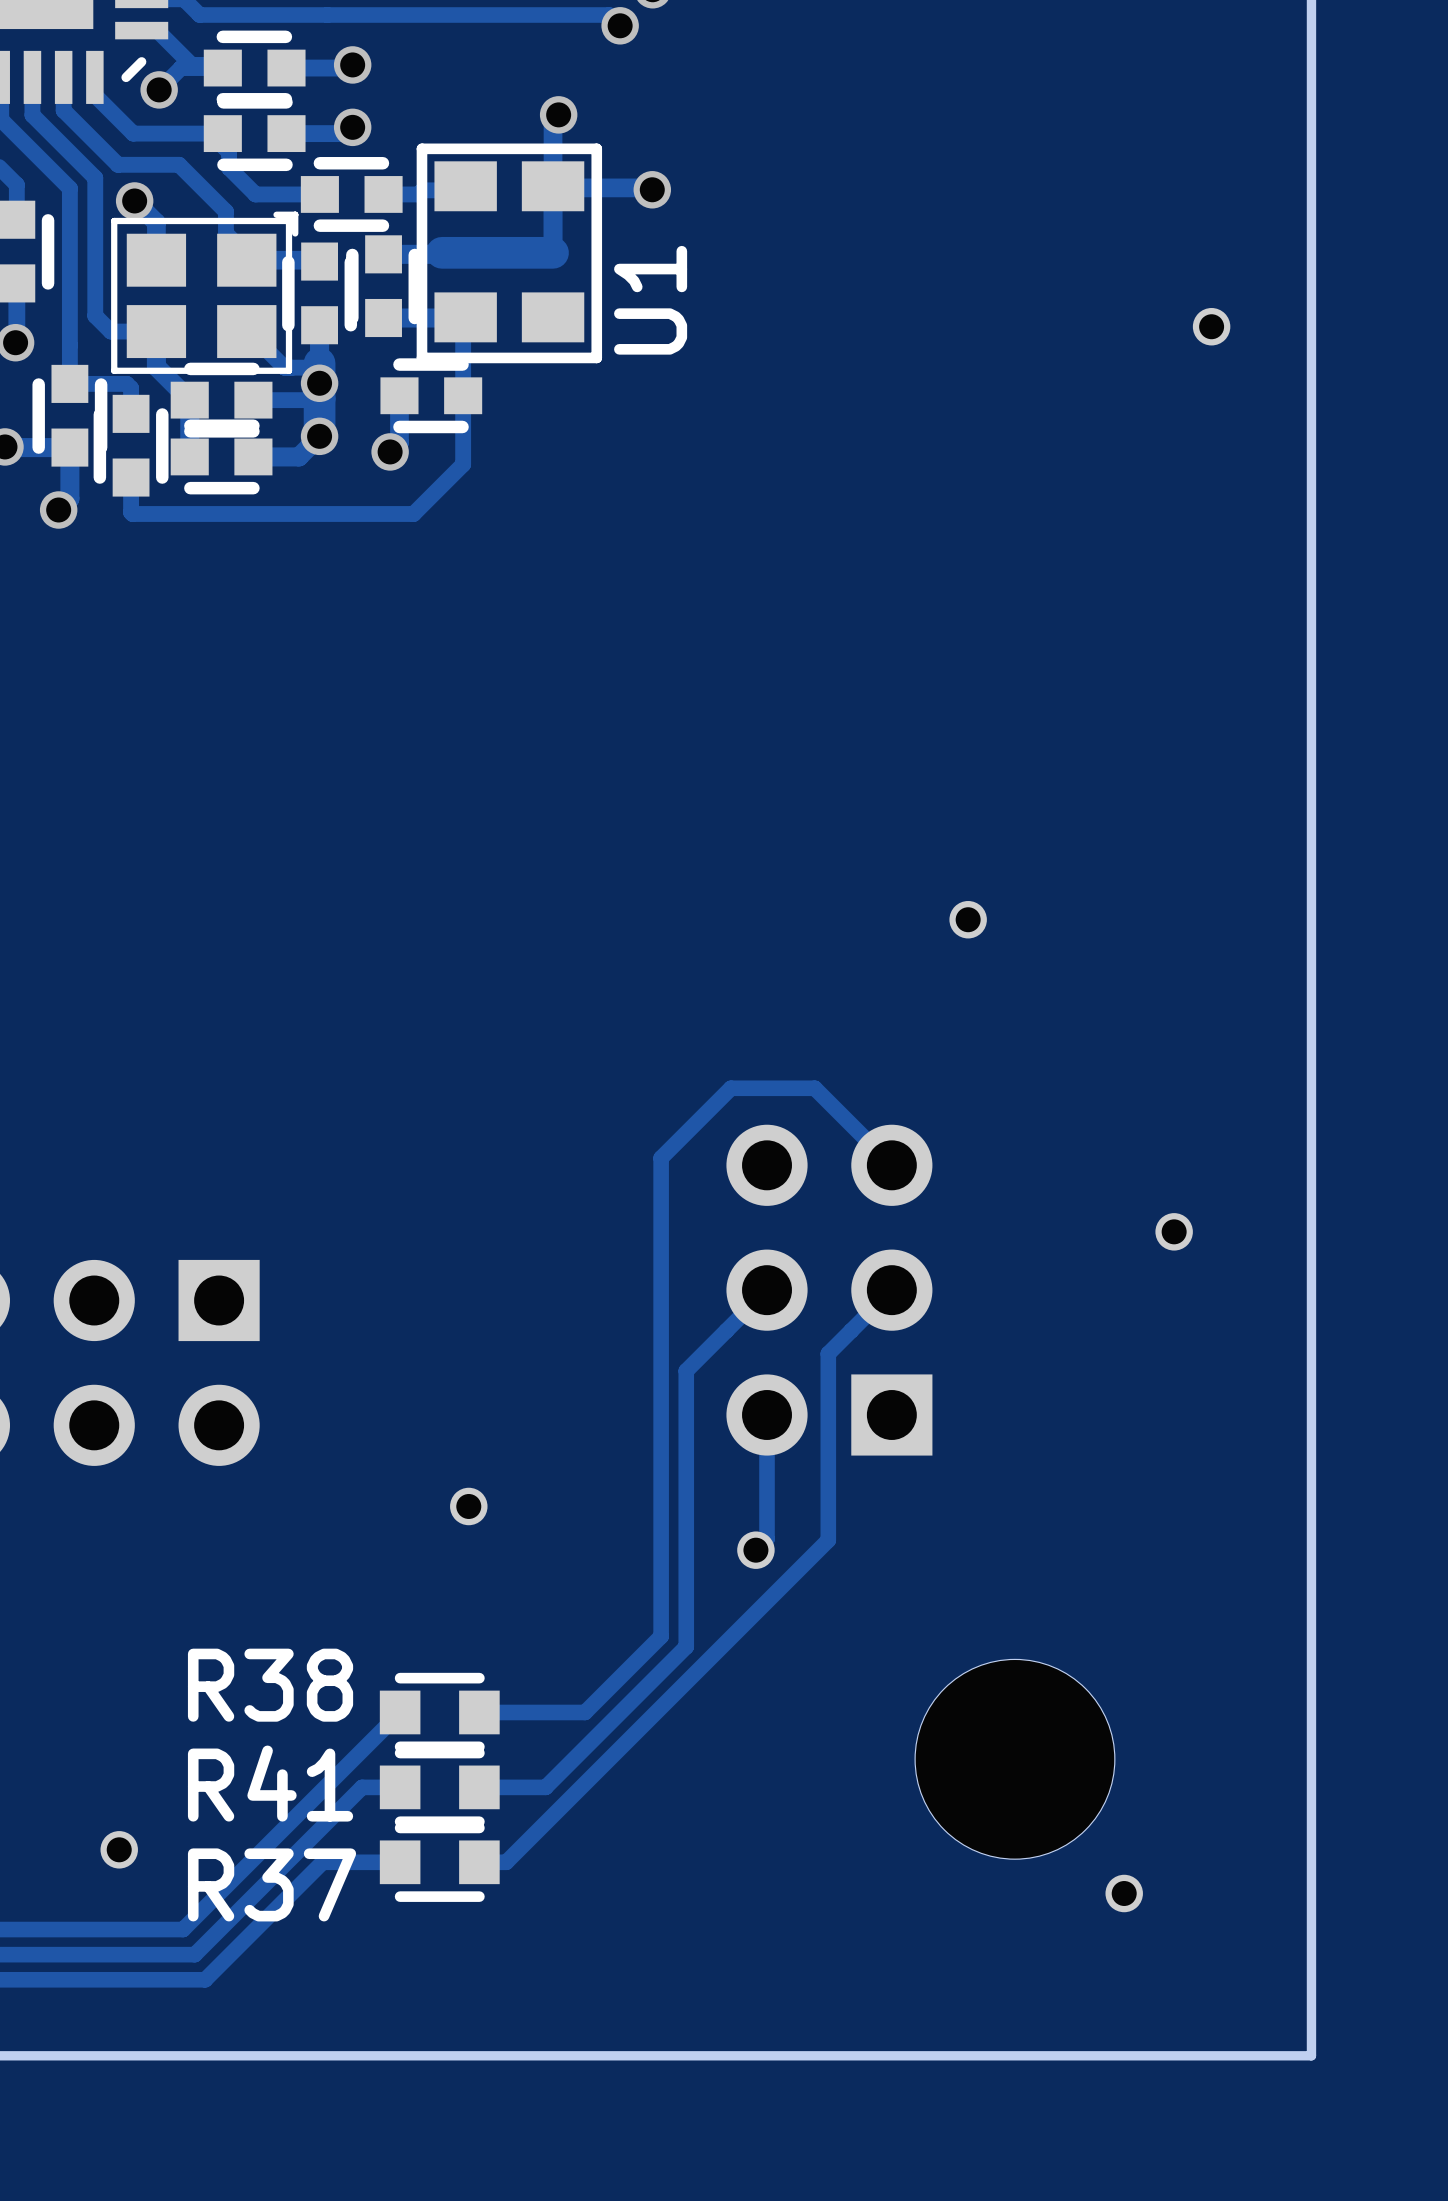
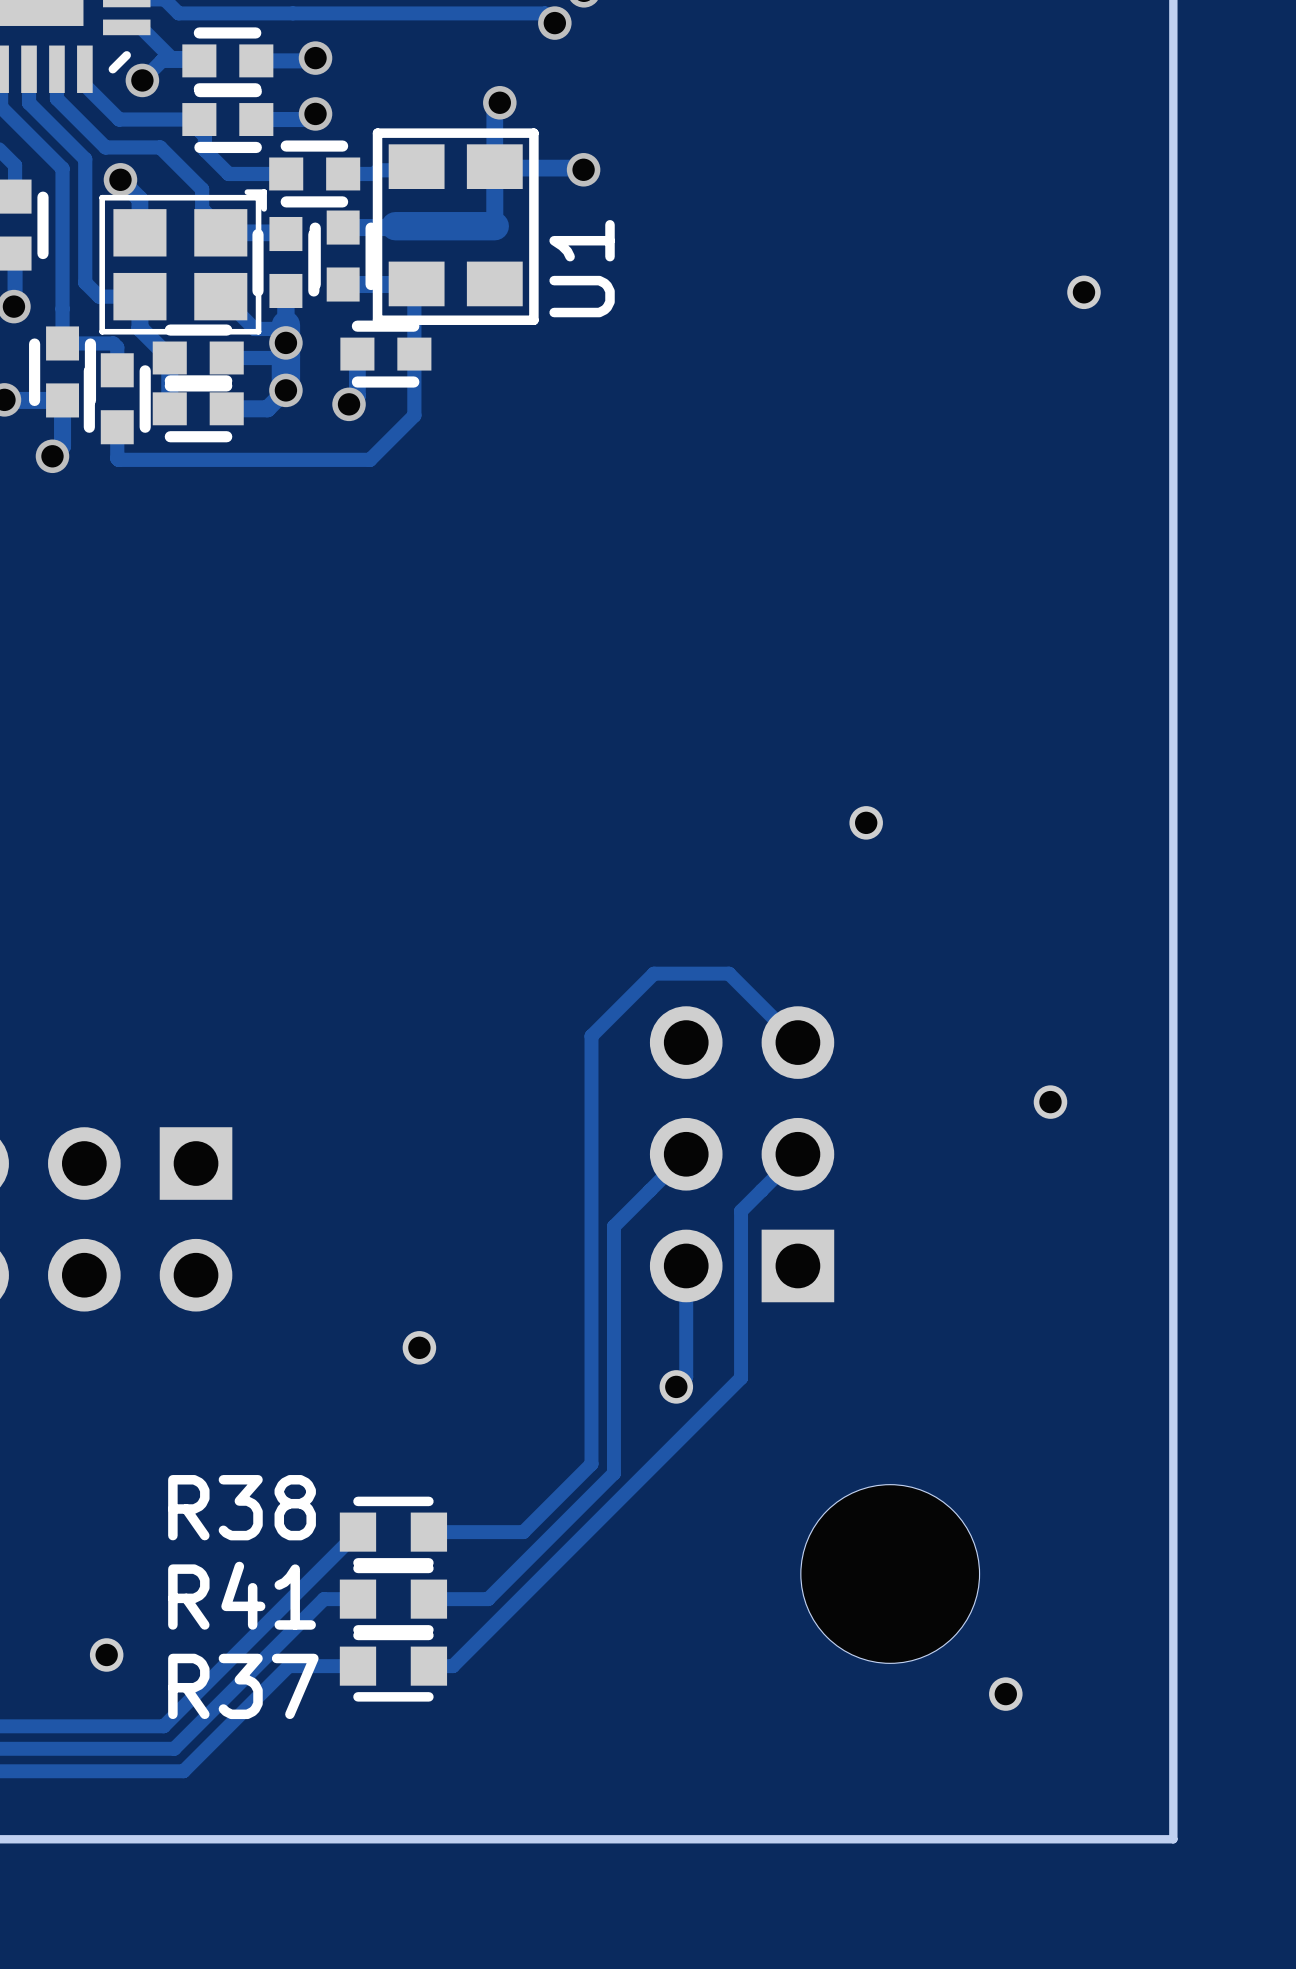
part position: (1014, 1759) -> (890, 1574)

